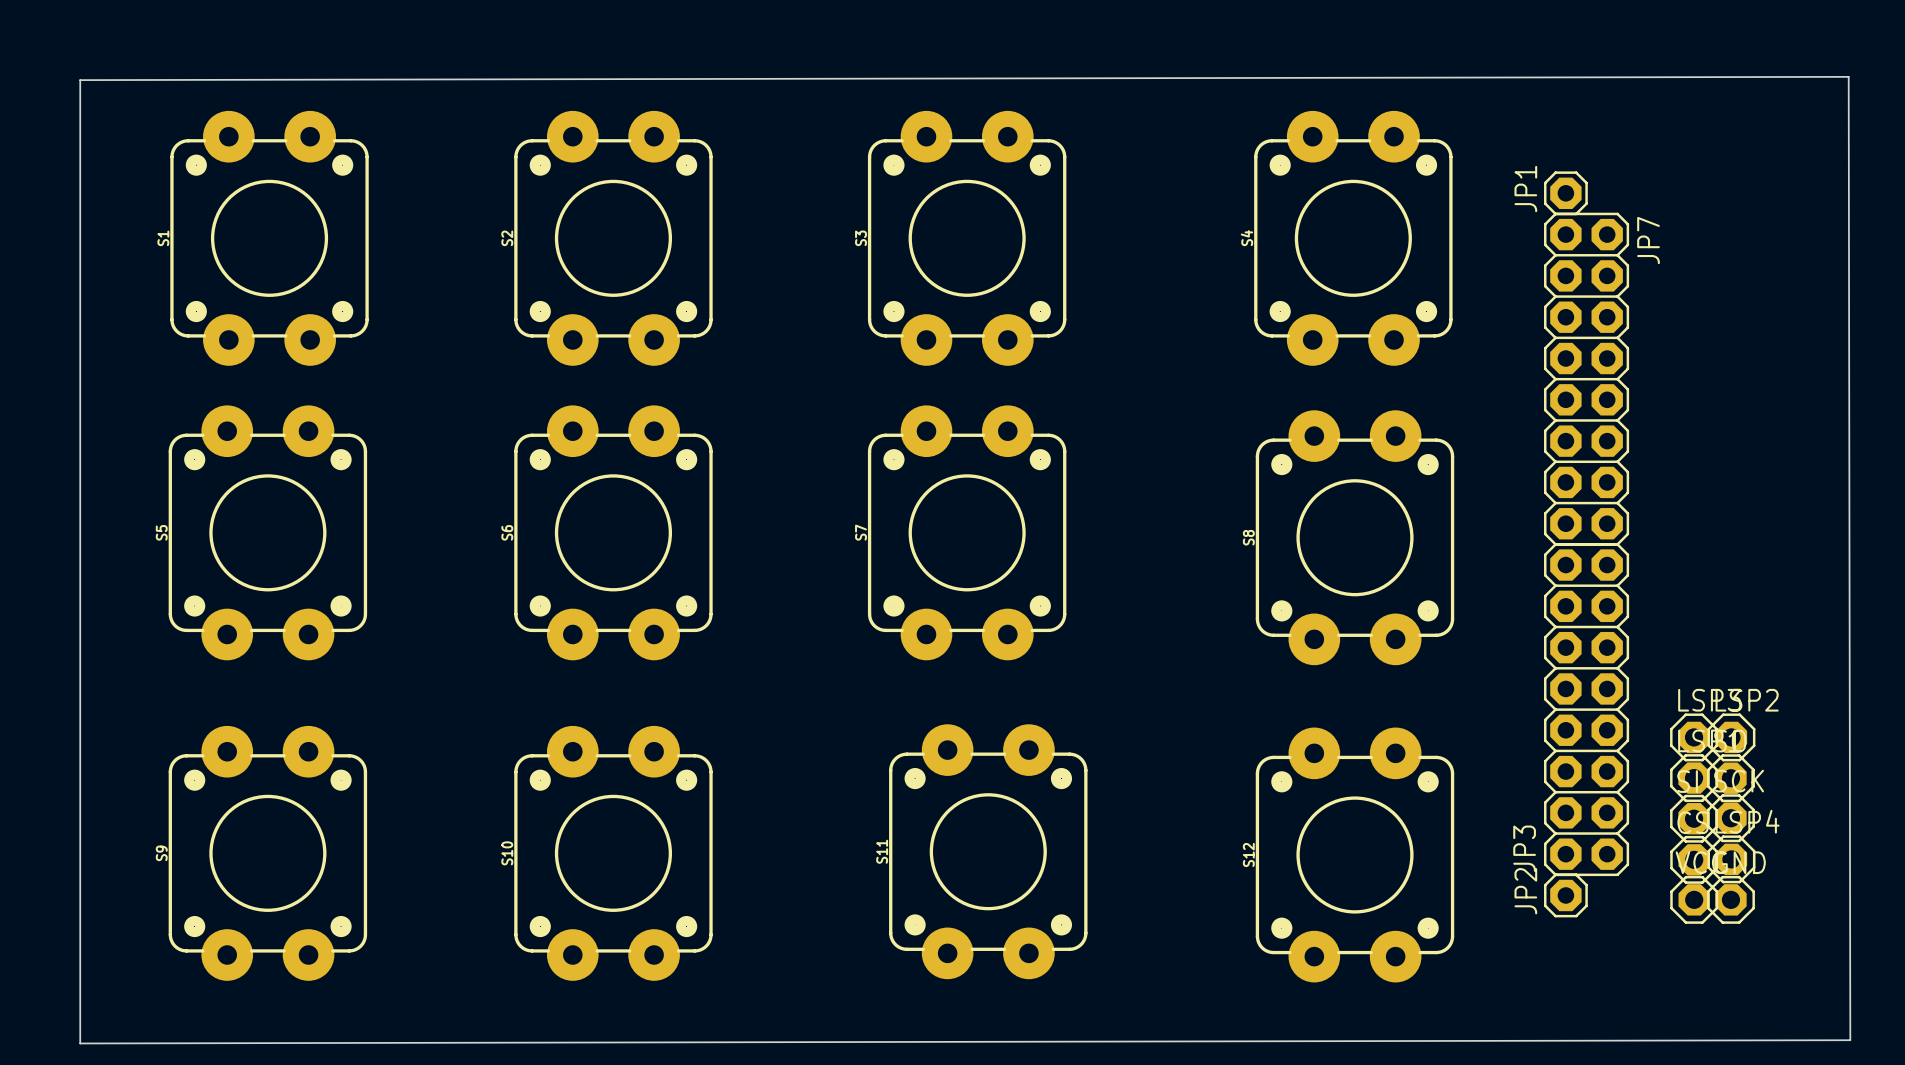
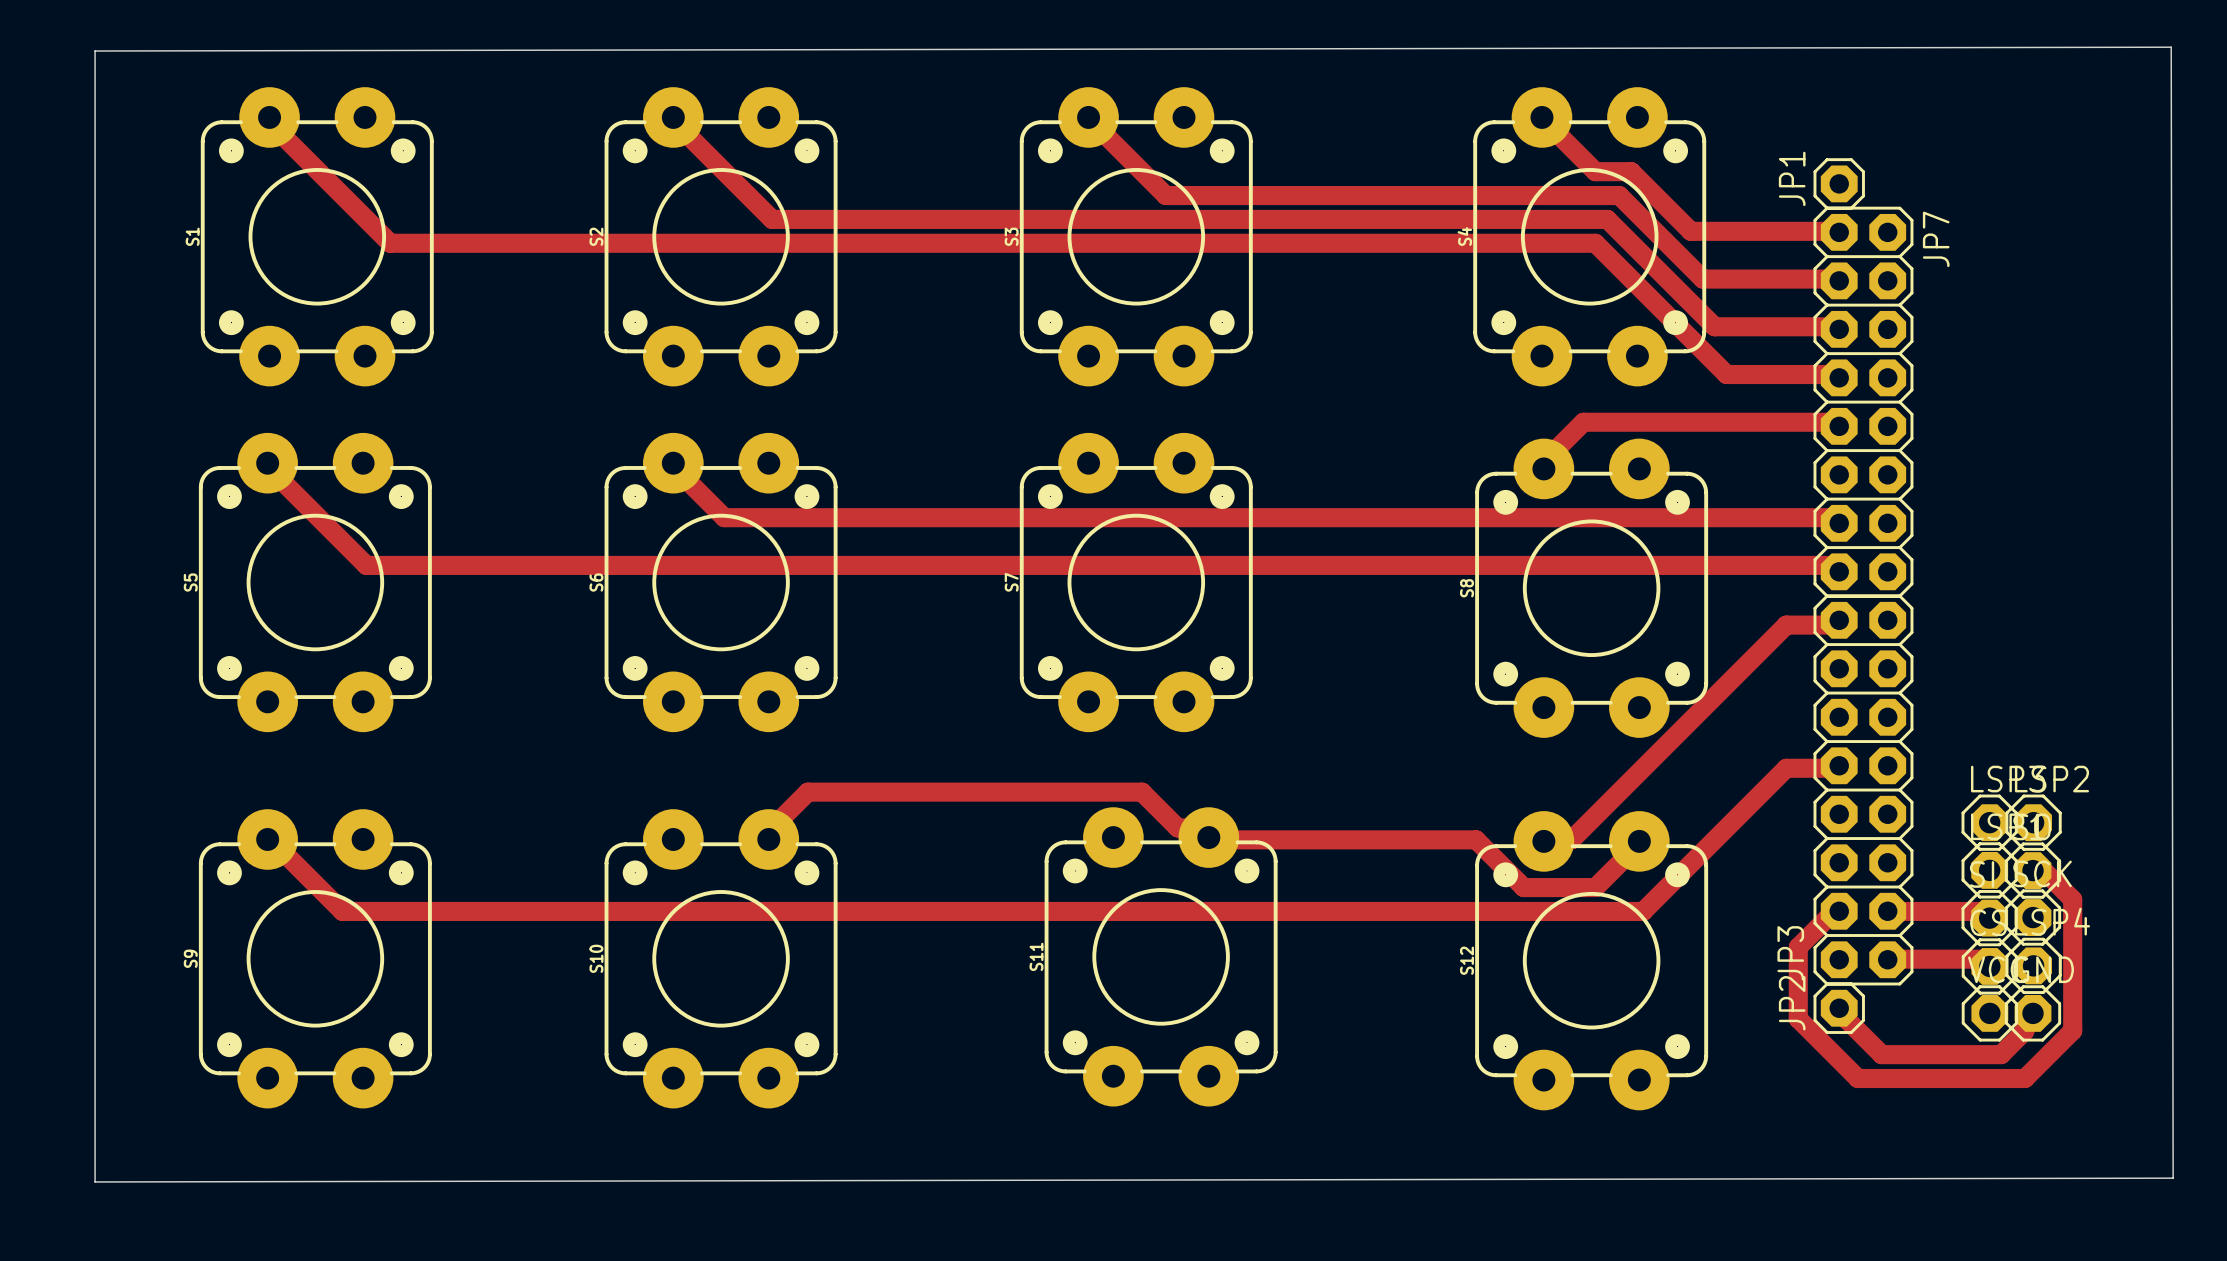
track: none -> (269, 117) (270, 123) (390, 243) (1595, 243) (1726, 374) (1834, 374) (1839, 377)
track: none -> (673, 117) (676, 123) (772, 219) (1607, 219) (1714, 326) (1834, 326) (1839, 329)
track: none -> (1088, 117) (1165, 195) (1619, 195) (1702, 279) (1834, 279) (1839, 280)
track: none -> (1541, 117) (1595, 171) (1631, 171) (1690, 231) (1839, 232)
track: none -> (1839, 426) (1834, 422) (1583, 422) (1547, 458) (1543, 468)
track: none -> (267, 463) (270, 469) (366, 565) (1834, 565) (1839, 571)
track: none -> (673, 463) (676, 469) (724, 517) (1834, 517) (1839, 523)
track: none -> (1839, 620) (1834, 625) (1786, 625) (1571, 839) (1543, 841)
track: none -> (1839, 765) (1834, 768) (1786, 768) (1643, 911) (342, 911) (270, 839) (267, 839)
track: none -> (768, 839) (772, 827) (807, 792) (1142, 792) (1177, 827) (1201, 827) (1208, 837) (1213, 839) (1476, 839) (1523, 887) (1595, 887) (1639, 841)
track: none -> (2033, 870) (2036, 863) (2072, 899) (2072, 1030) (2024, 1078) (1857, 1078) (1798, 1018) (1798, 947) (1834, 911) (1839, 911)
track: none -> (1887, 911) (1989, 911) (1989, 918)
track: none -> (1887, 959) (1989, 959) (1989, 966)
track: none -> (1839, 1008) (1846, 1018) (1881, 1054) (2001, 1054) (2024, 1030) (2024, 1018) (2033, 1013)

